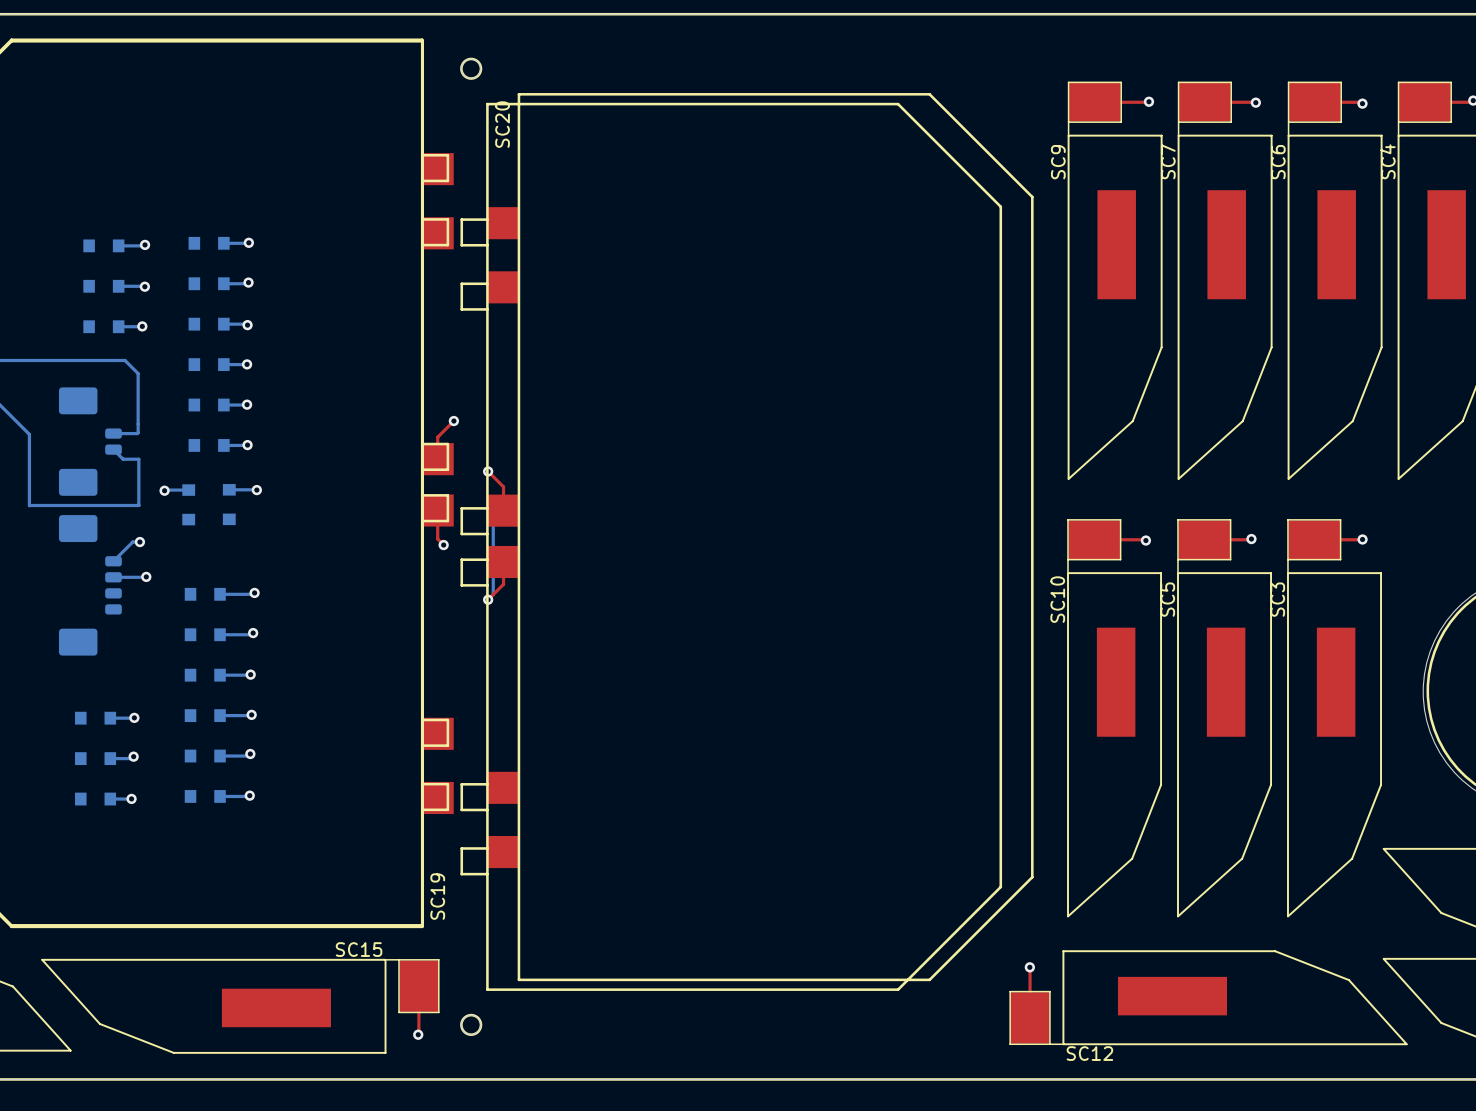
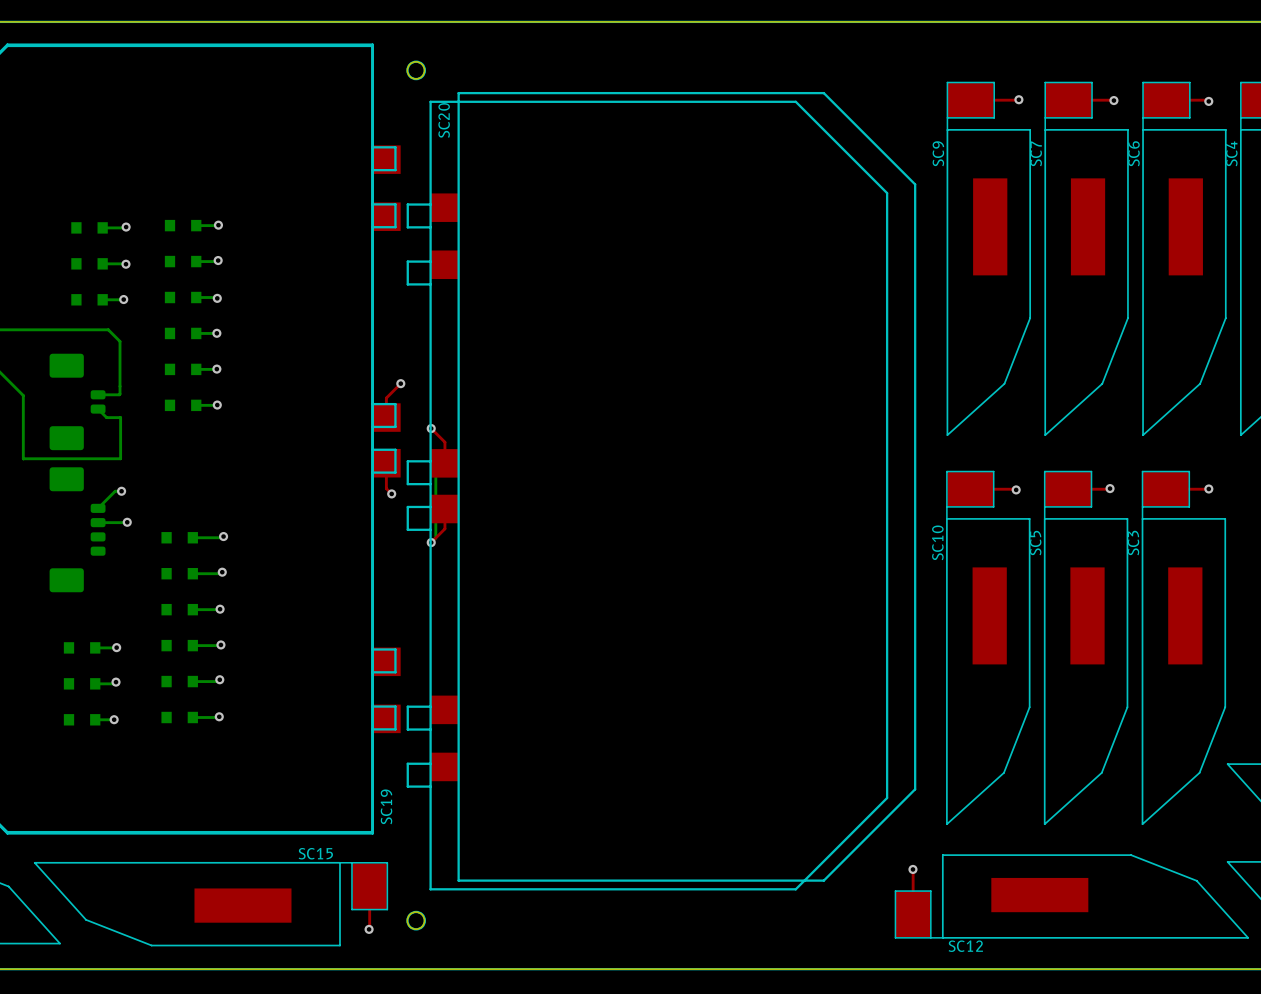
bottom track: (229, 489) (256, 490) -> none
via: (164, 490) -> none
bottom track: (188, 490) (164, 490) -> none
via: (256, 490) -> none
part: (188, 504) -> none
part: (229, 504) -> none

